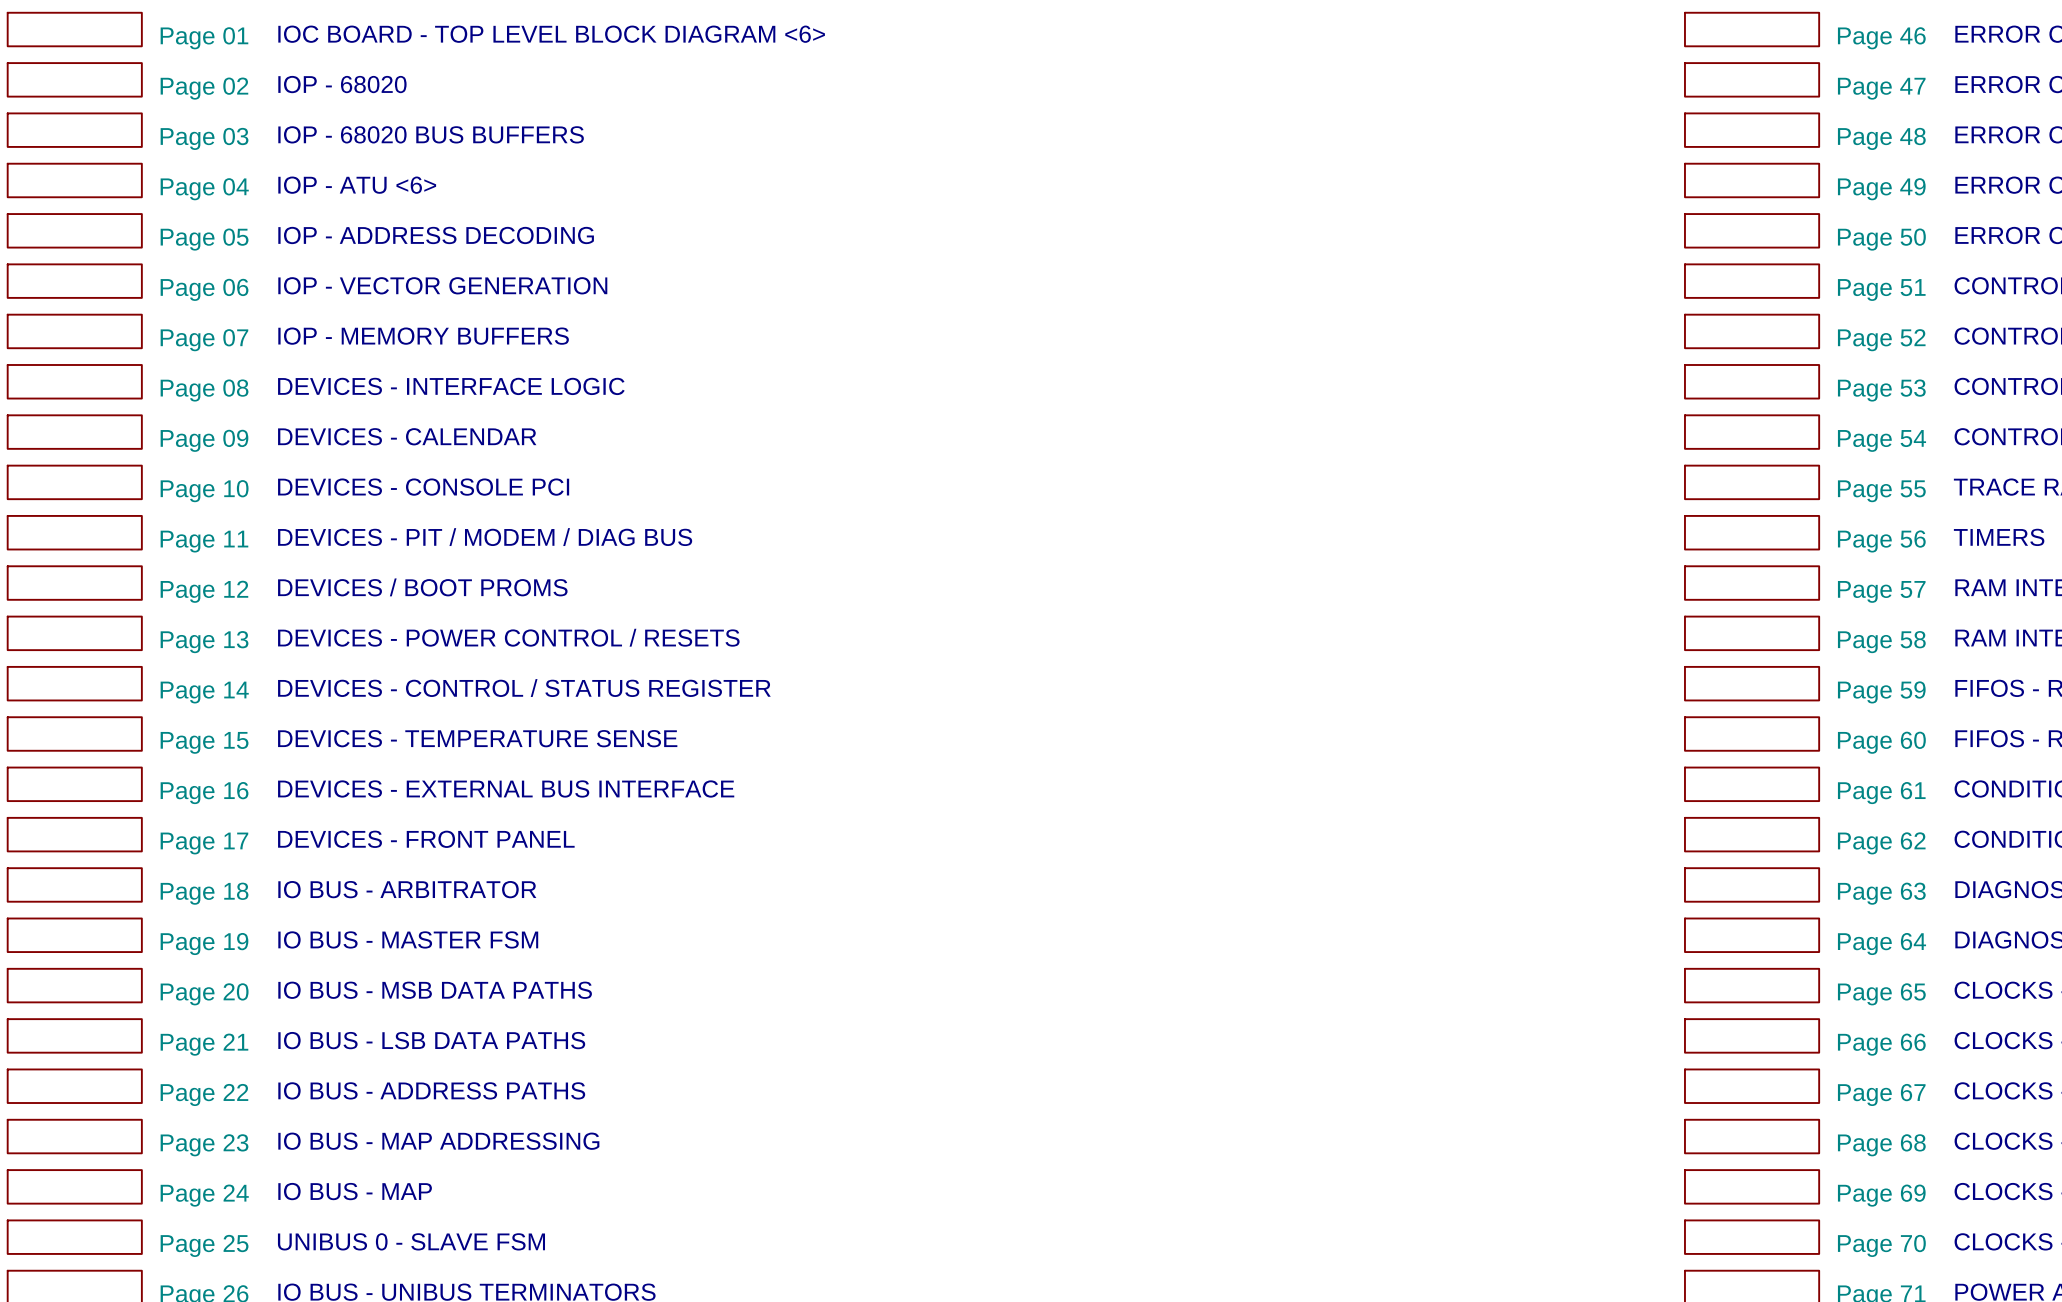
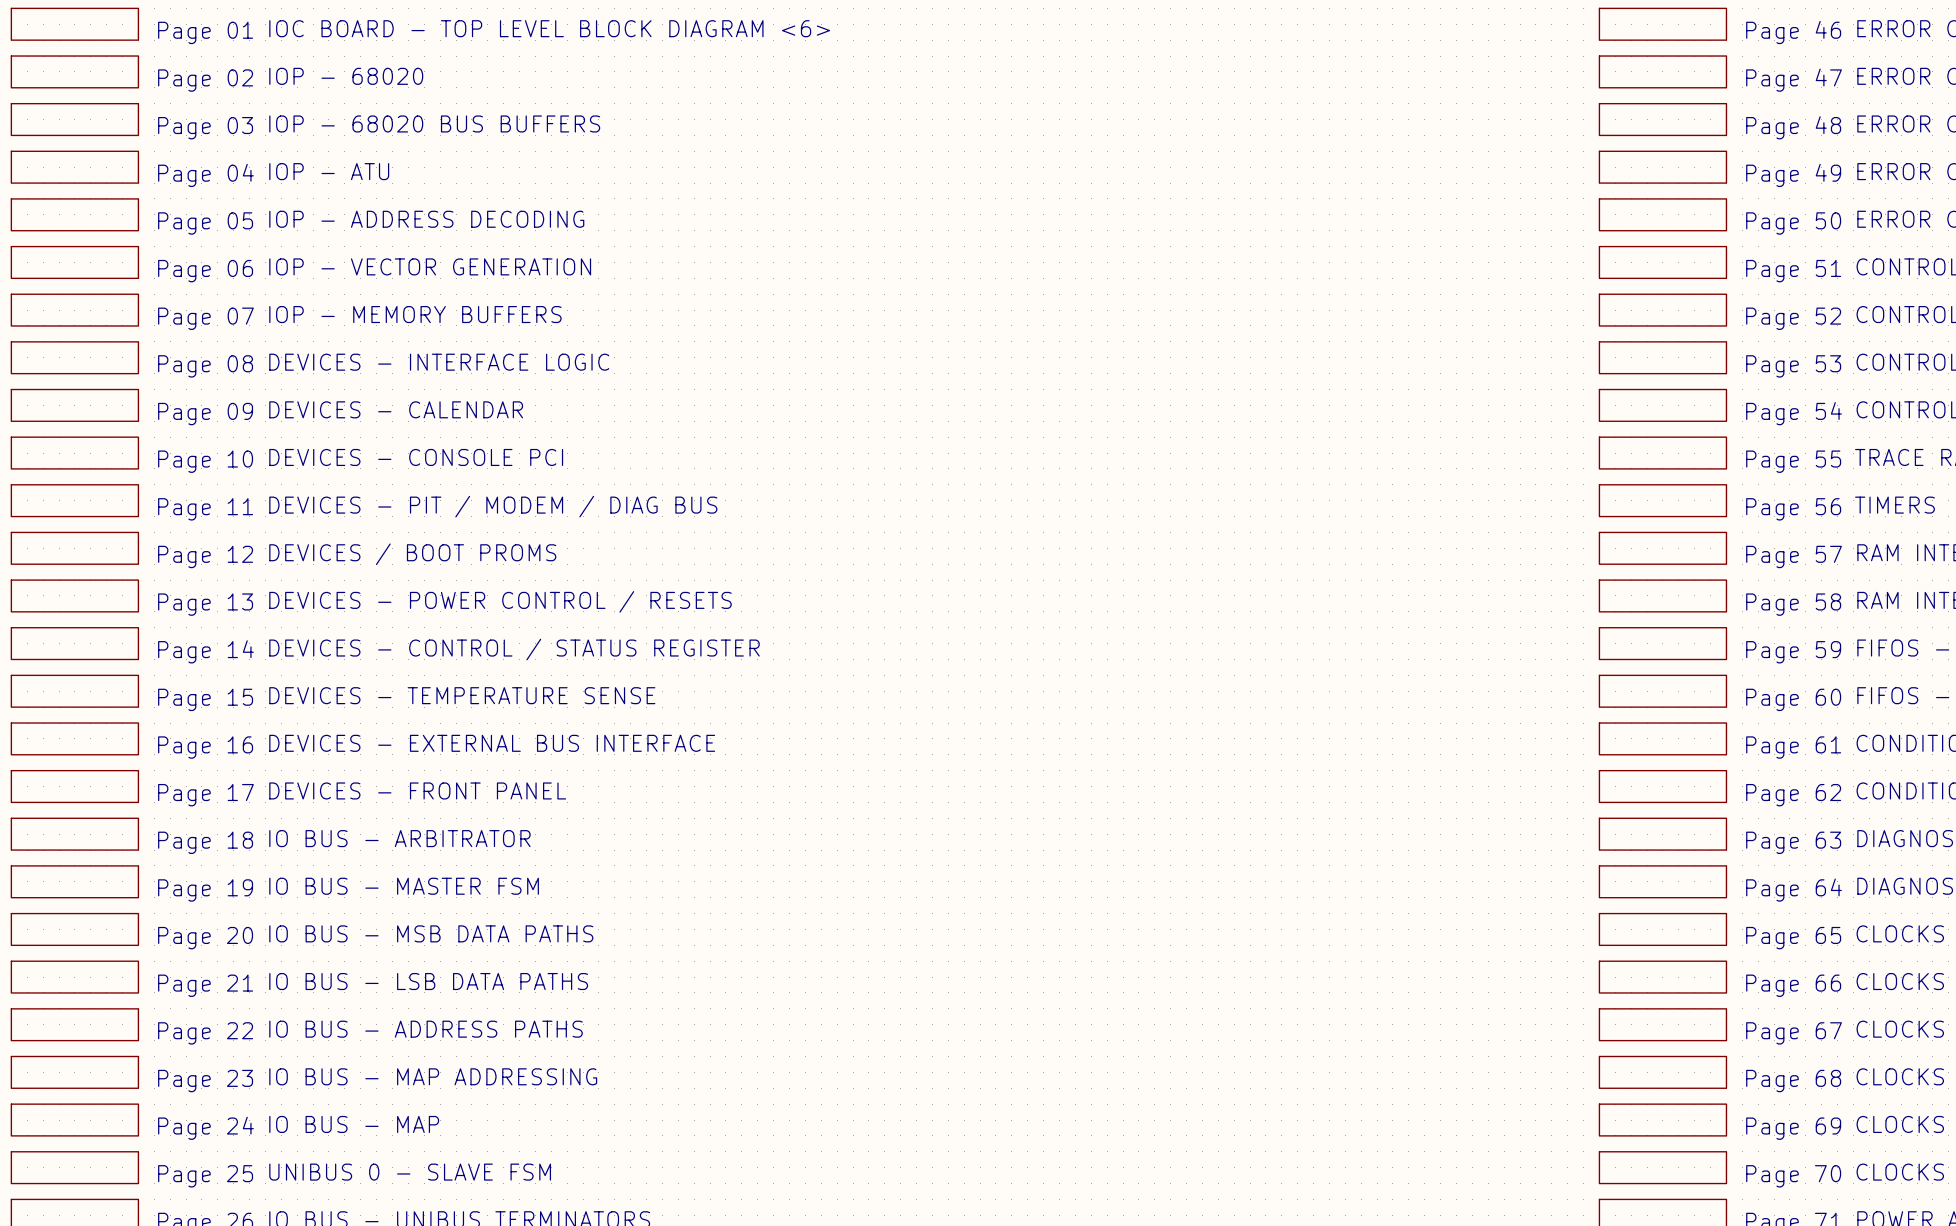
text: IOP - ATU <6> (357, 185) -> IOP - ATU (329, 171)

